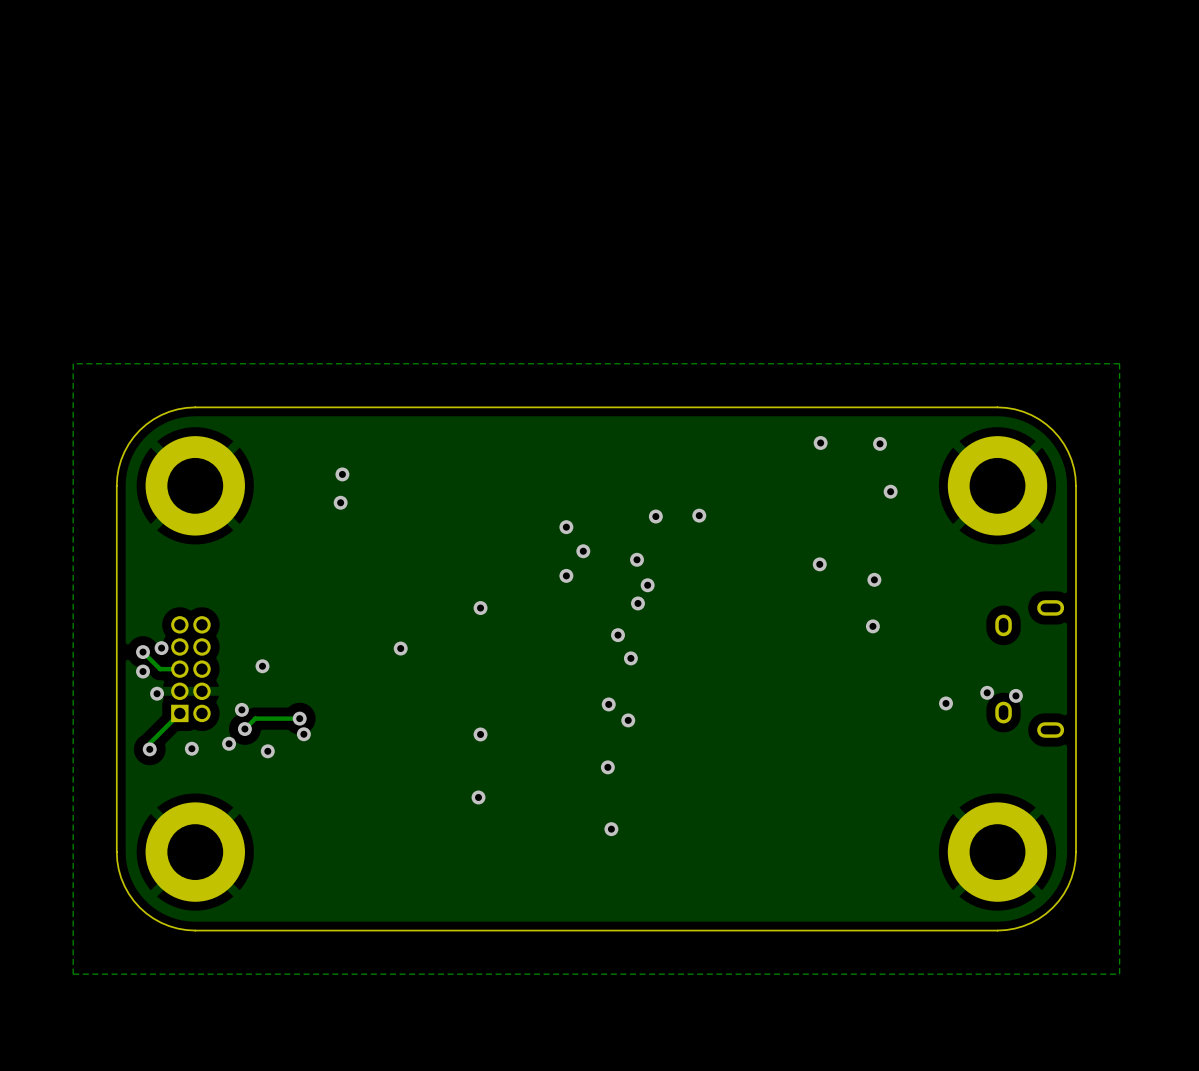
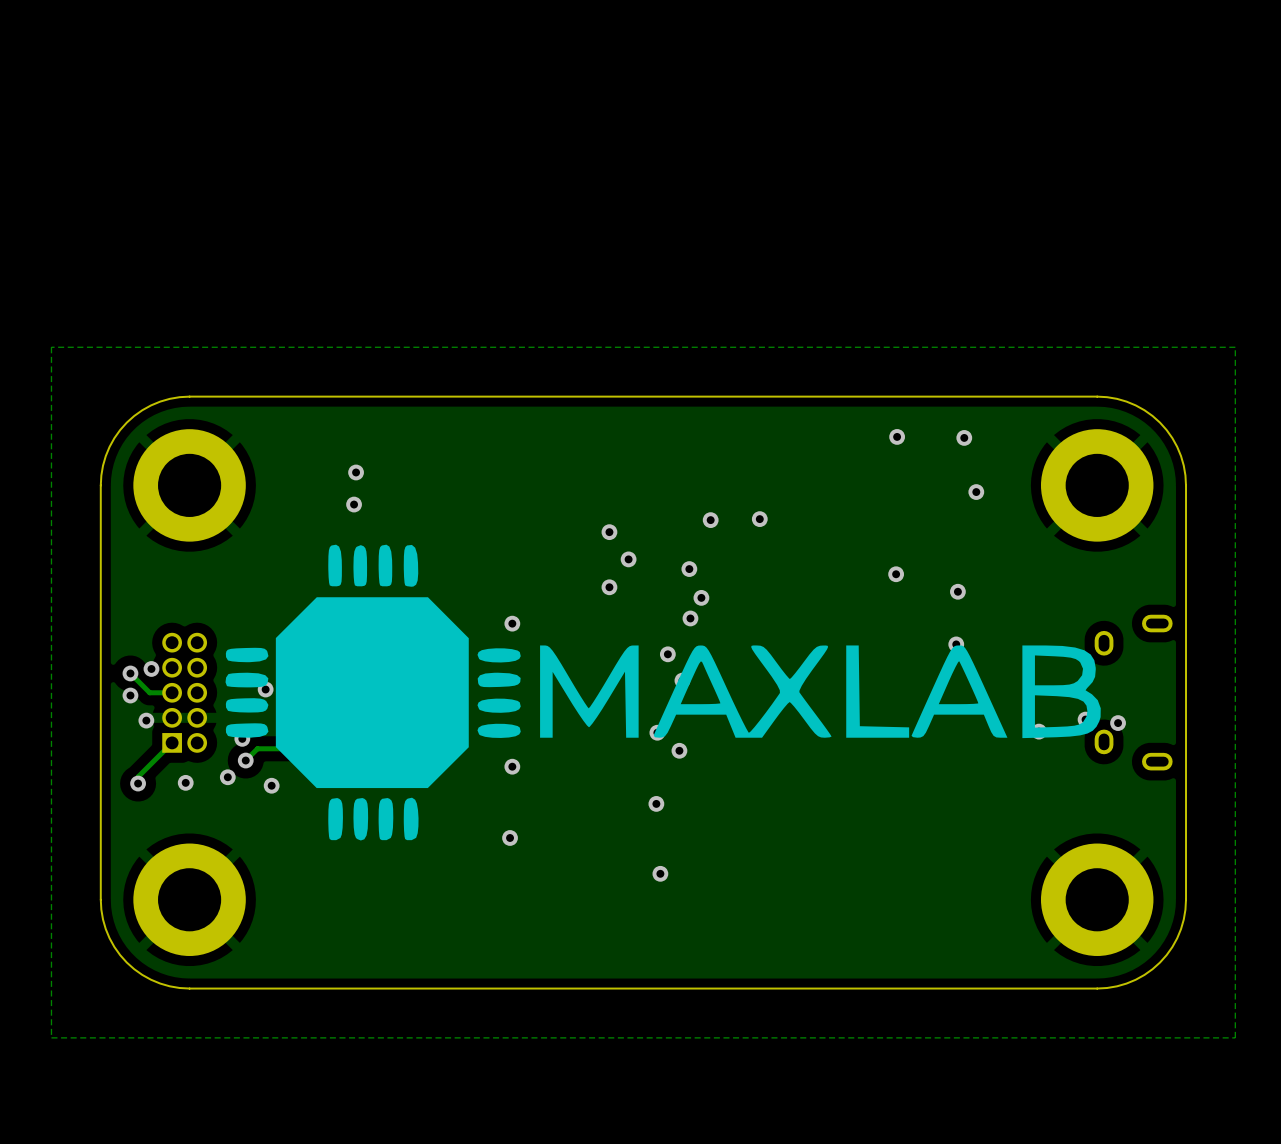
drawing: none -> [225, 544, 1101, 841]

